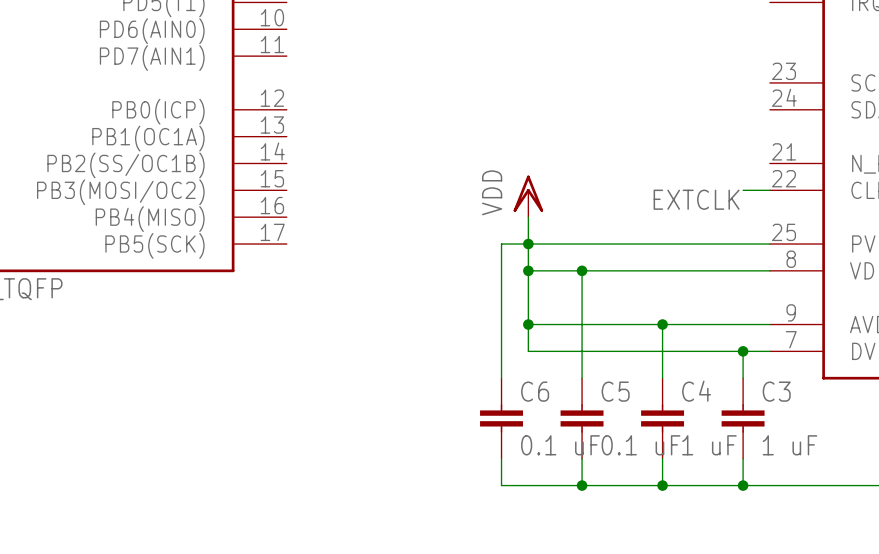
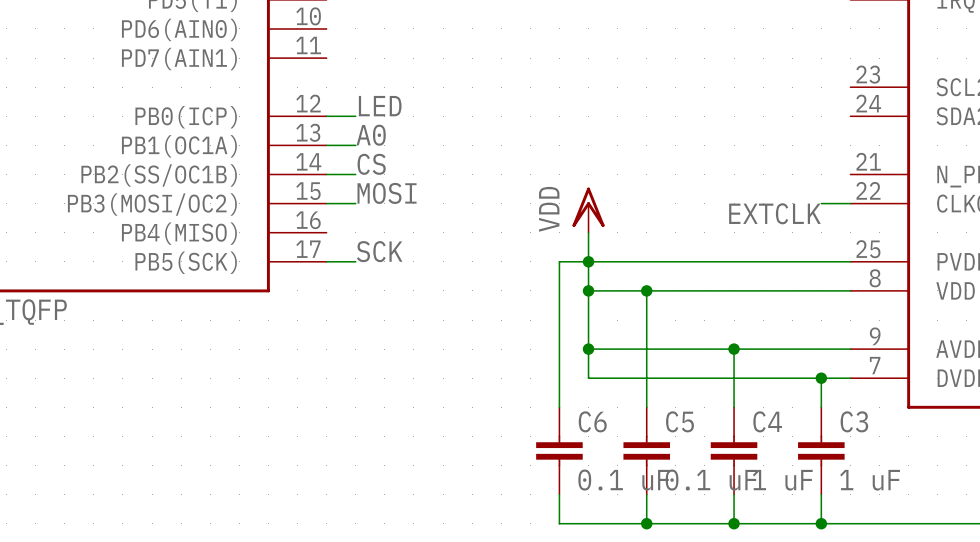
label: none -> LED (380, 106)
wire: none -> (326, 116) (355, 116)
label: none -> A0 (371, 135)
wire: none -> (326, 145) (355, 145)
label: none -> CS (371, 164)
wire: none -> (326, 174) (355, 174)
label: none -> MOSI (387, 193)
wire: none -> (326, 203) (355, 203)
label: none -> SCK (379, 251)
wire: none -> (326, 261) (355, 261)

